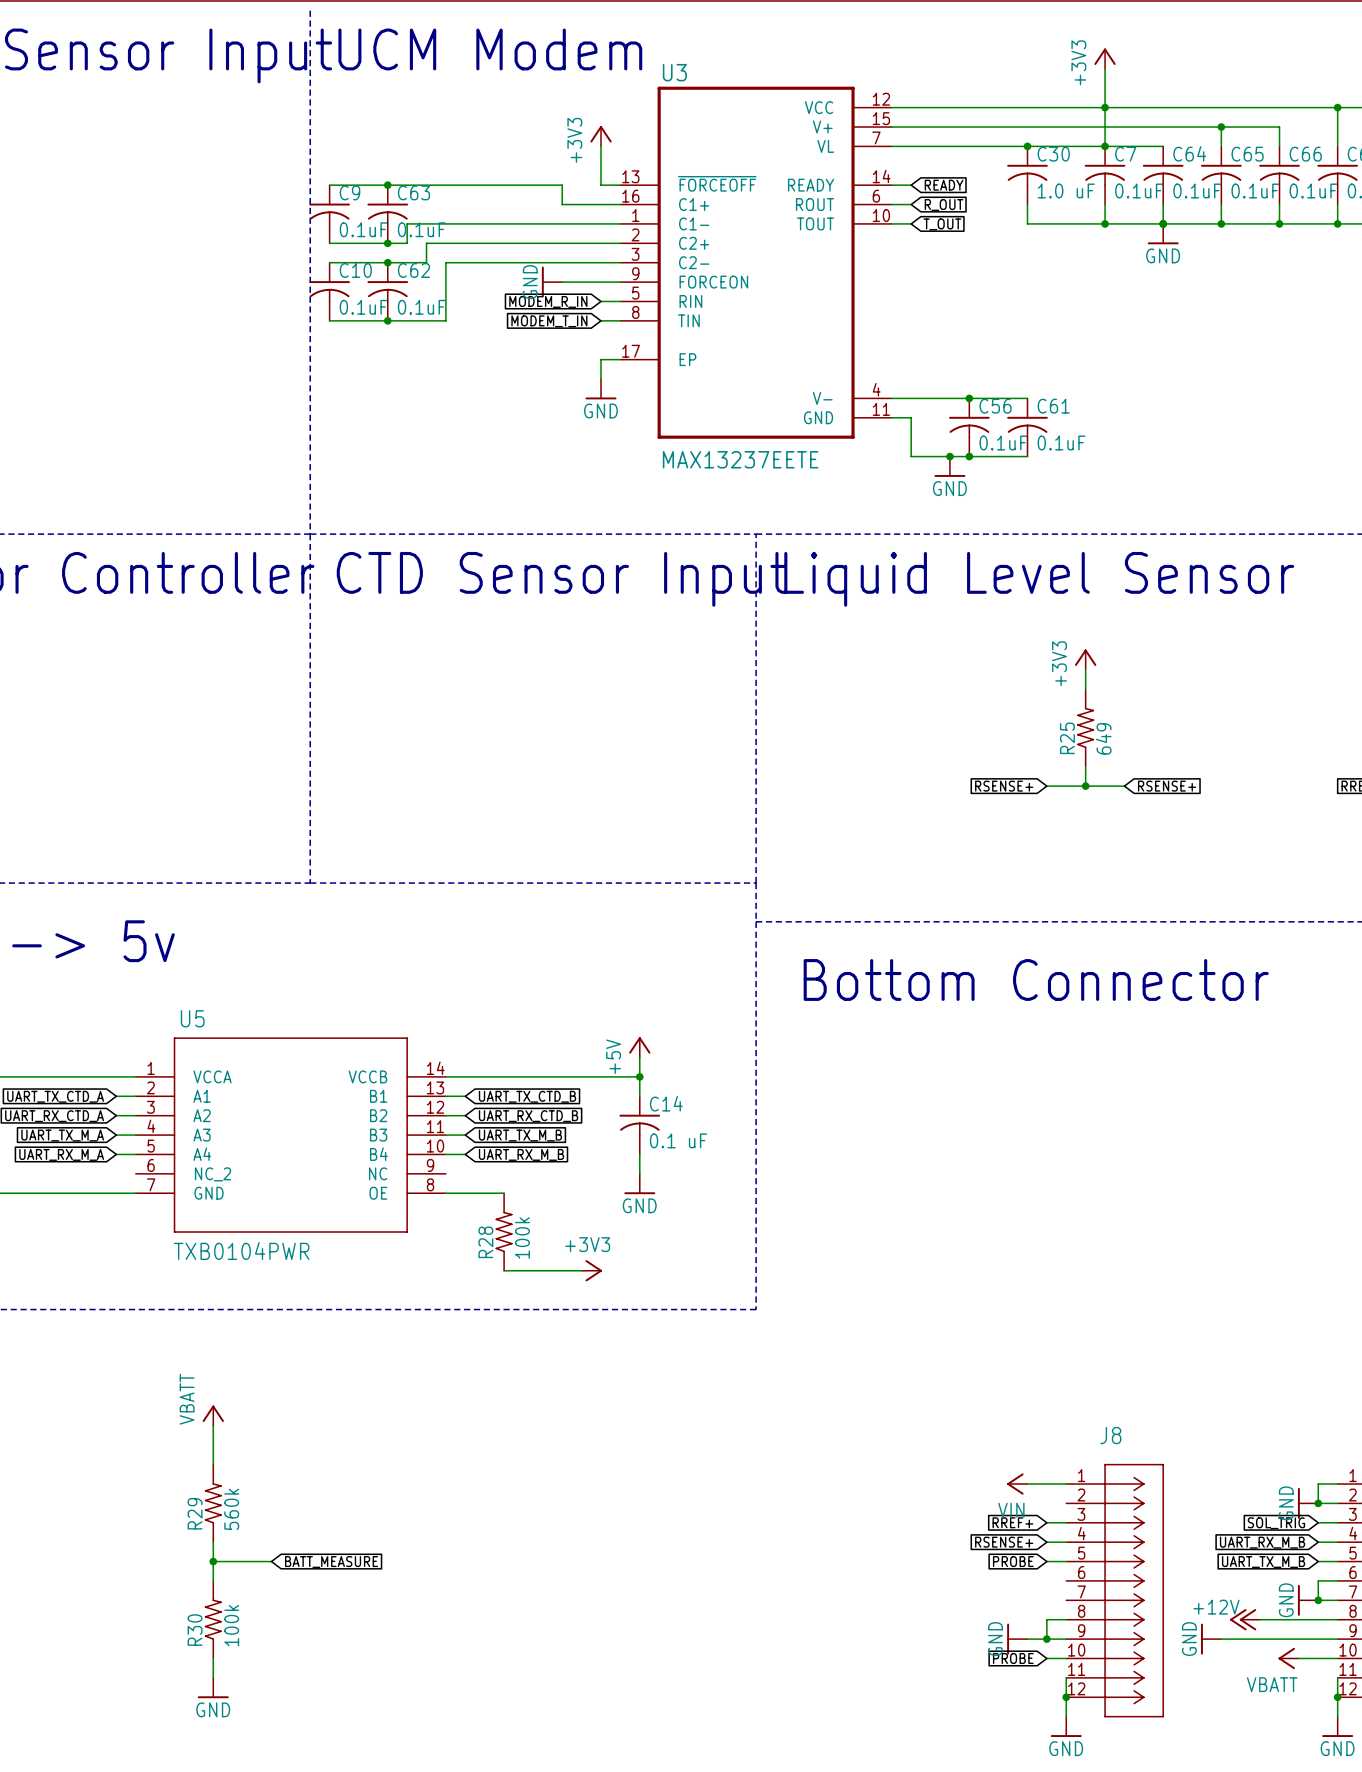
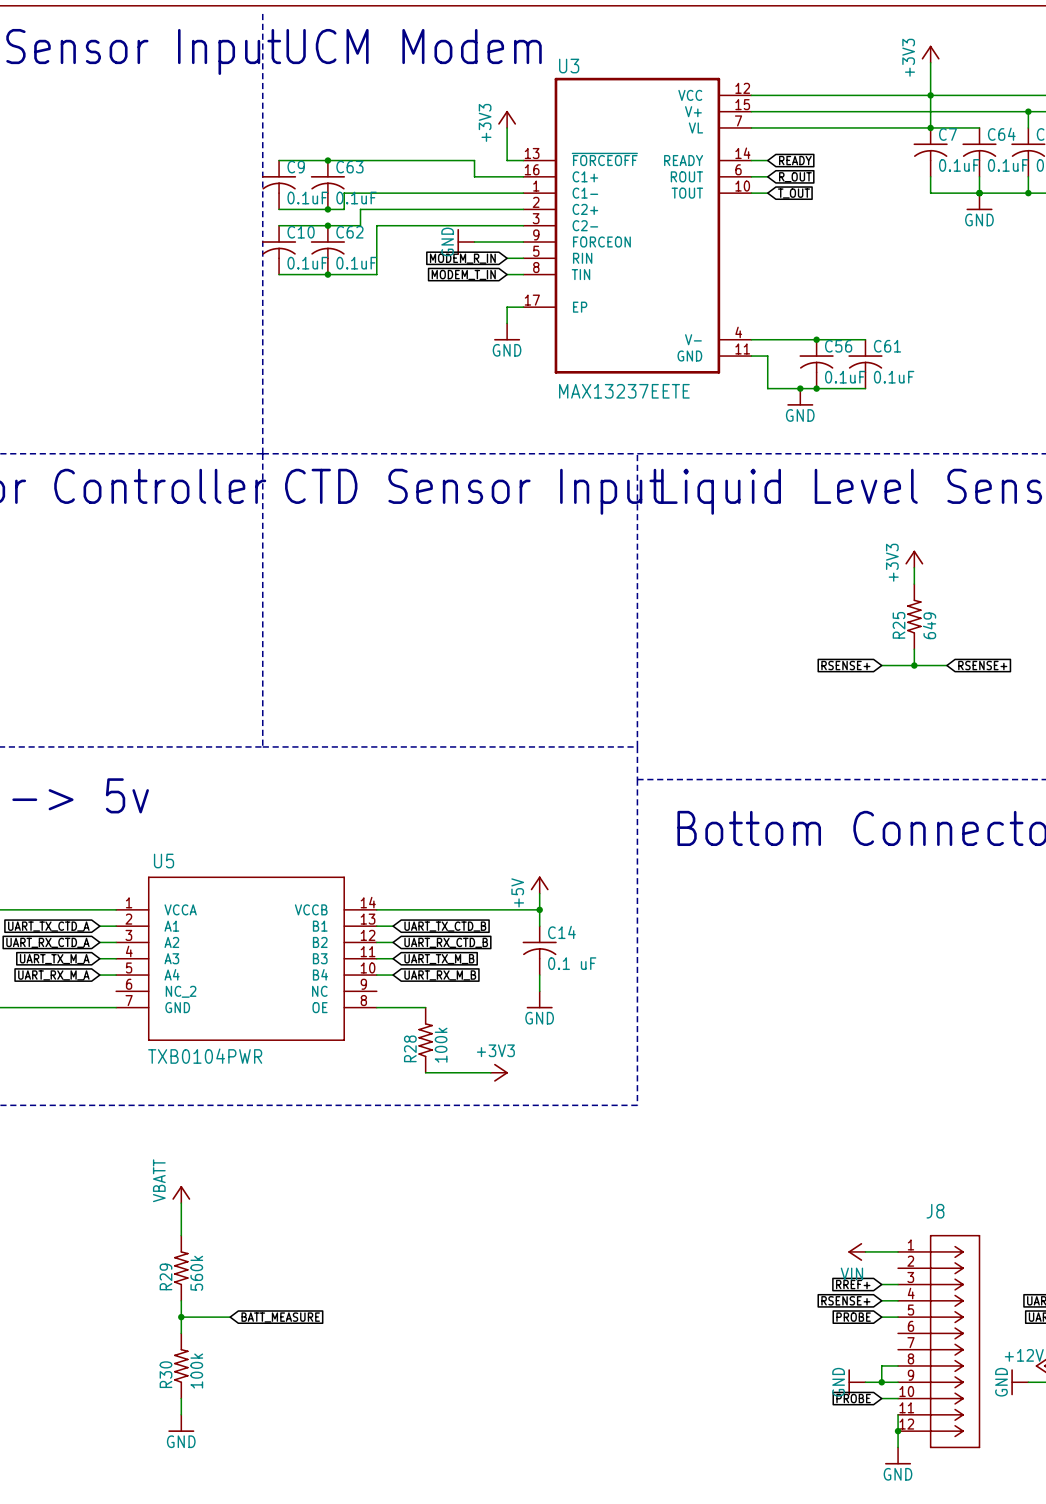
junction: (1027, 146) -> none
C30: 1.0 uF (1027, 175) -> none
wire: (1027, 204) (1027, 223) (1105, 223) -> none
junction: (1105, 223) -> none

